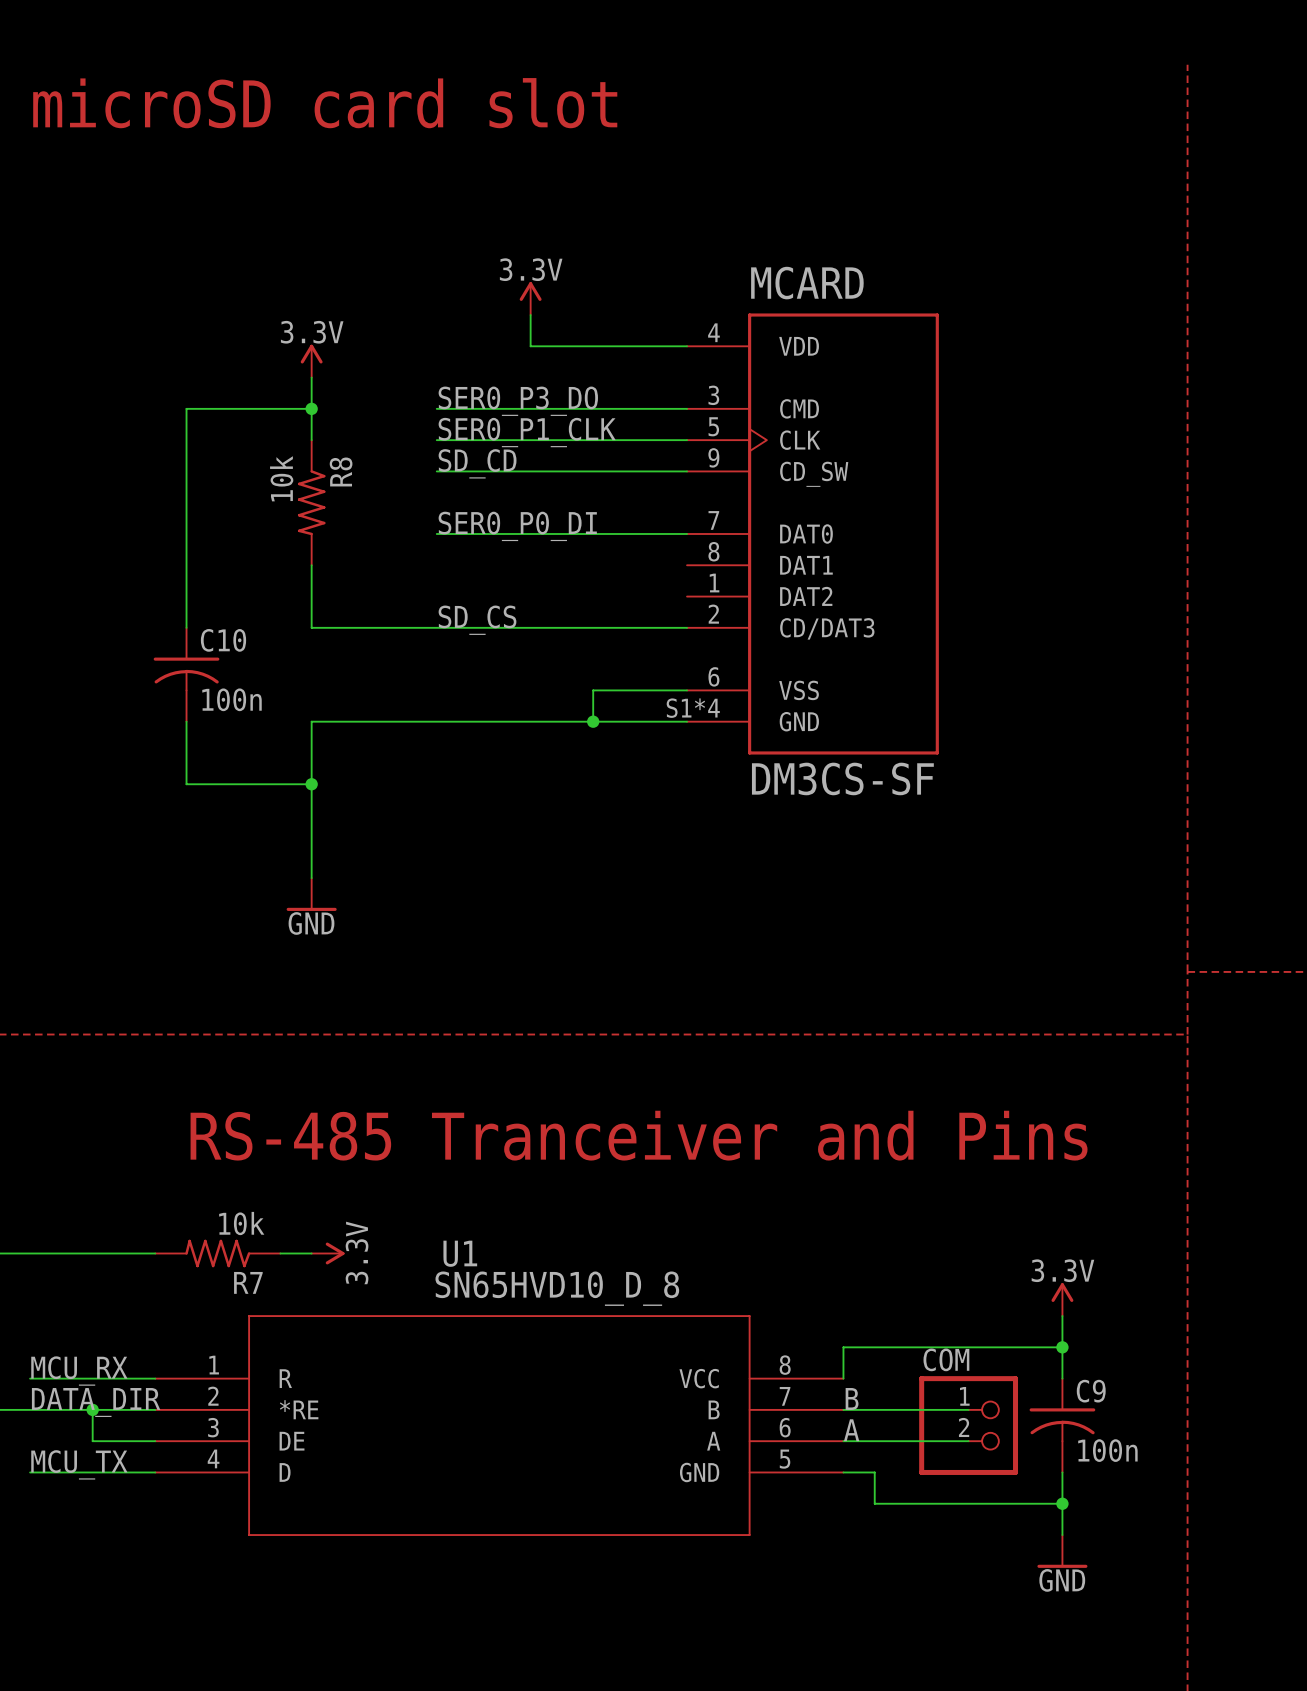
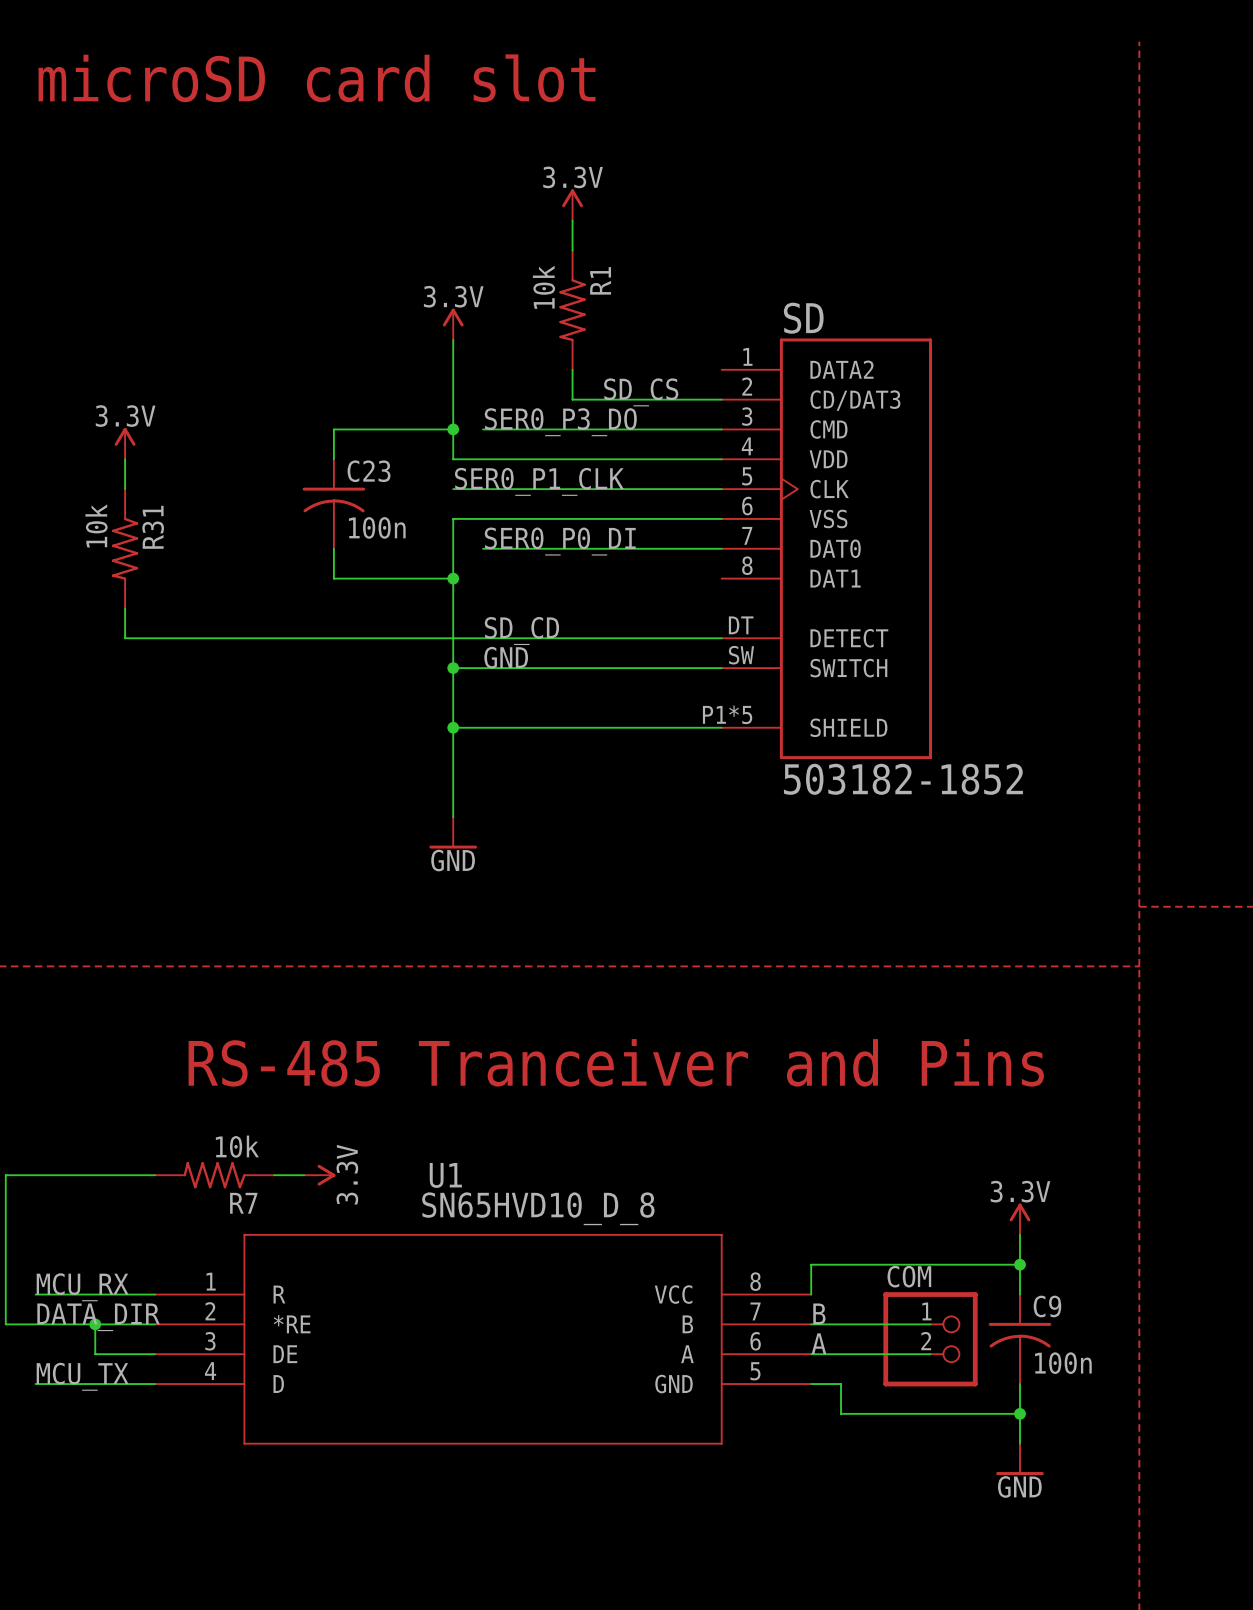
power symbol: none -> 3.3V (572, 204)
wire: none -> (572, 220) (572, 250)
power symbol: 3.3V (530, 298) -> none
wire: (530, 315) (530, 346) (687, 346) -> none
R1: none -> 10k (572, 310)
power symbol: 3.3V (311, 361) -> none
power symbol: none -> 3.3V (453, 324)
wire: (311, 377) (311, 440) -> none
wire: none -> (453, 339) (453, 459) (721, 459)
label position: SER0_P3_DO (518, 401) -> SER0_P3_DO (560, 422)
wire: (311, 408) (186, 408) (186, 627) -> none
junction: (311, 408) -> none
wire: (436, 408) (687, 408) -> (483, 548) (721, 548)
label position: SER0_P1_CLK (527, 432) -> SER0_P1_CLK (539, 481)
wire: (436, 440) (593, 440) -> (572, 369) (572, 399)
label position: SD_CD (477, 463) -> SD_CD (521, 631)
wire: none -> (423, 429) (333, 429) (333, 459)
wire: (468, 471) (499, 471) -> none
junction: none -> (453, 429)
power symbol: none -> 3.3V (125, 443)
wire: none -> (125, 459) (125, 489)
R8: 10k (311, 502) -> none
label position: SER0_P0_DI (517, 526) -> SER0_P0_DI (560, 541)
wire: (436, 533) (468, 533) -> none
MCARD: DM3CS-SF (812, 533) -> none
C23: none -> 100n (333, 504)
wire: (311, 565) (311, 627) (342, 627) -> (333, 548) (333, 578)
wire: none -> (721, 518) (453, 518) (453, 817)
R31: none -> 10k (125, 548)
SD: none -> 503182-1852 (826, 548)
label position: SD_CS (477, 620) -> SD_CS (641, 392)
wire: (468, 627) (687, 627) -> none
junction: none -> (453, 578)
C10: 100n (186, 674) -> none
wire: (593, 690) (593, 721) -> (572, 638) (125, 638) (125, 608)
label: none -> GND (506, 657)
wire: (186, 721) (186, 784) (311, 784) -> none
wire: (468, 721) (311, 721) (311, 878) -> none
junction: none -> (453, 668)
junction: (593, 721) -> none
junction: (311, 784) -> none
wire: none -> (453, 727) (721, 727)
junction: none -> (453, 727)
power symbol position: GND (311, 894) -> GND (453, 832)

